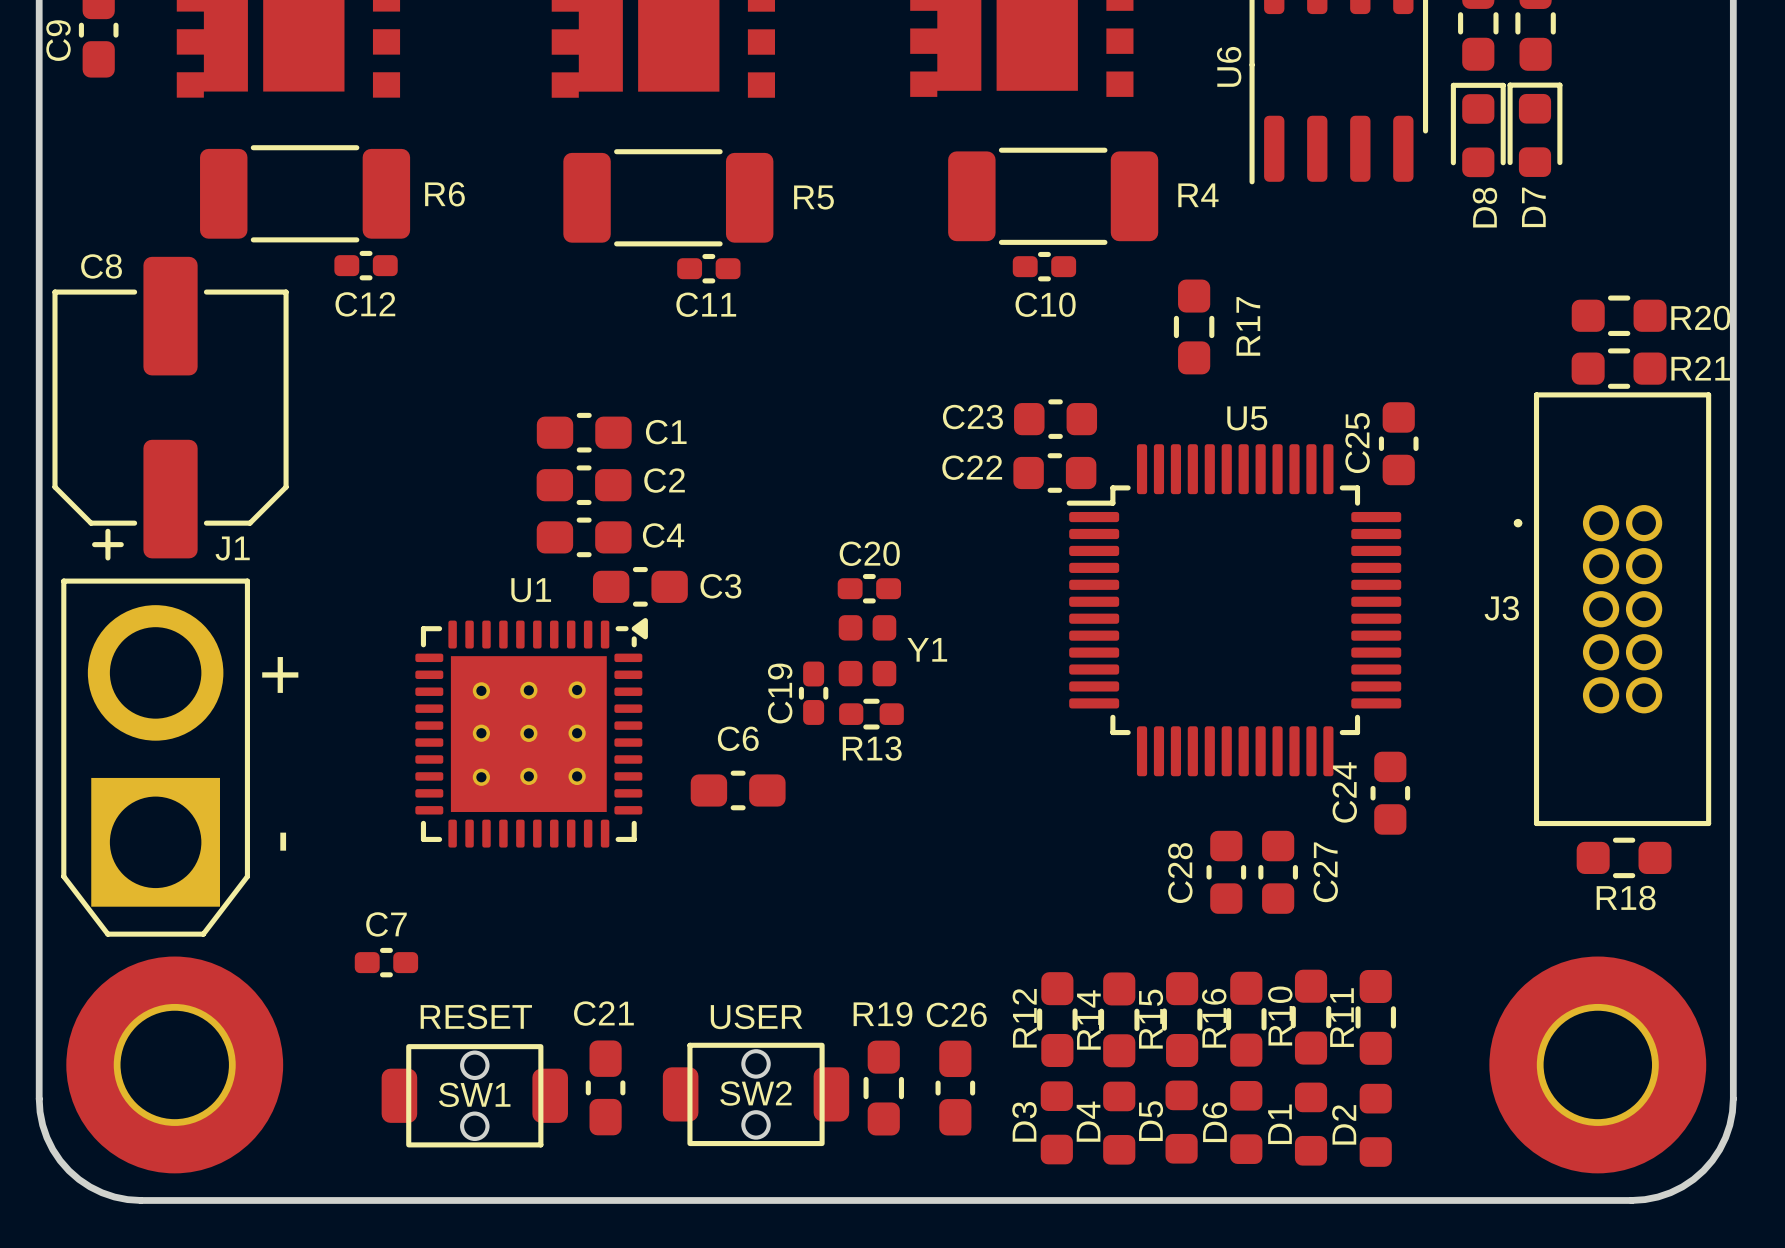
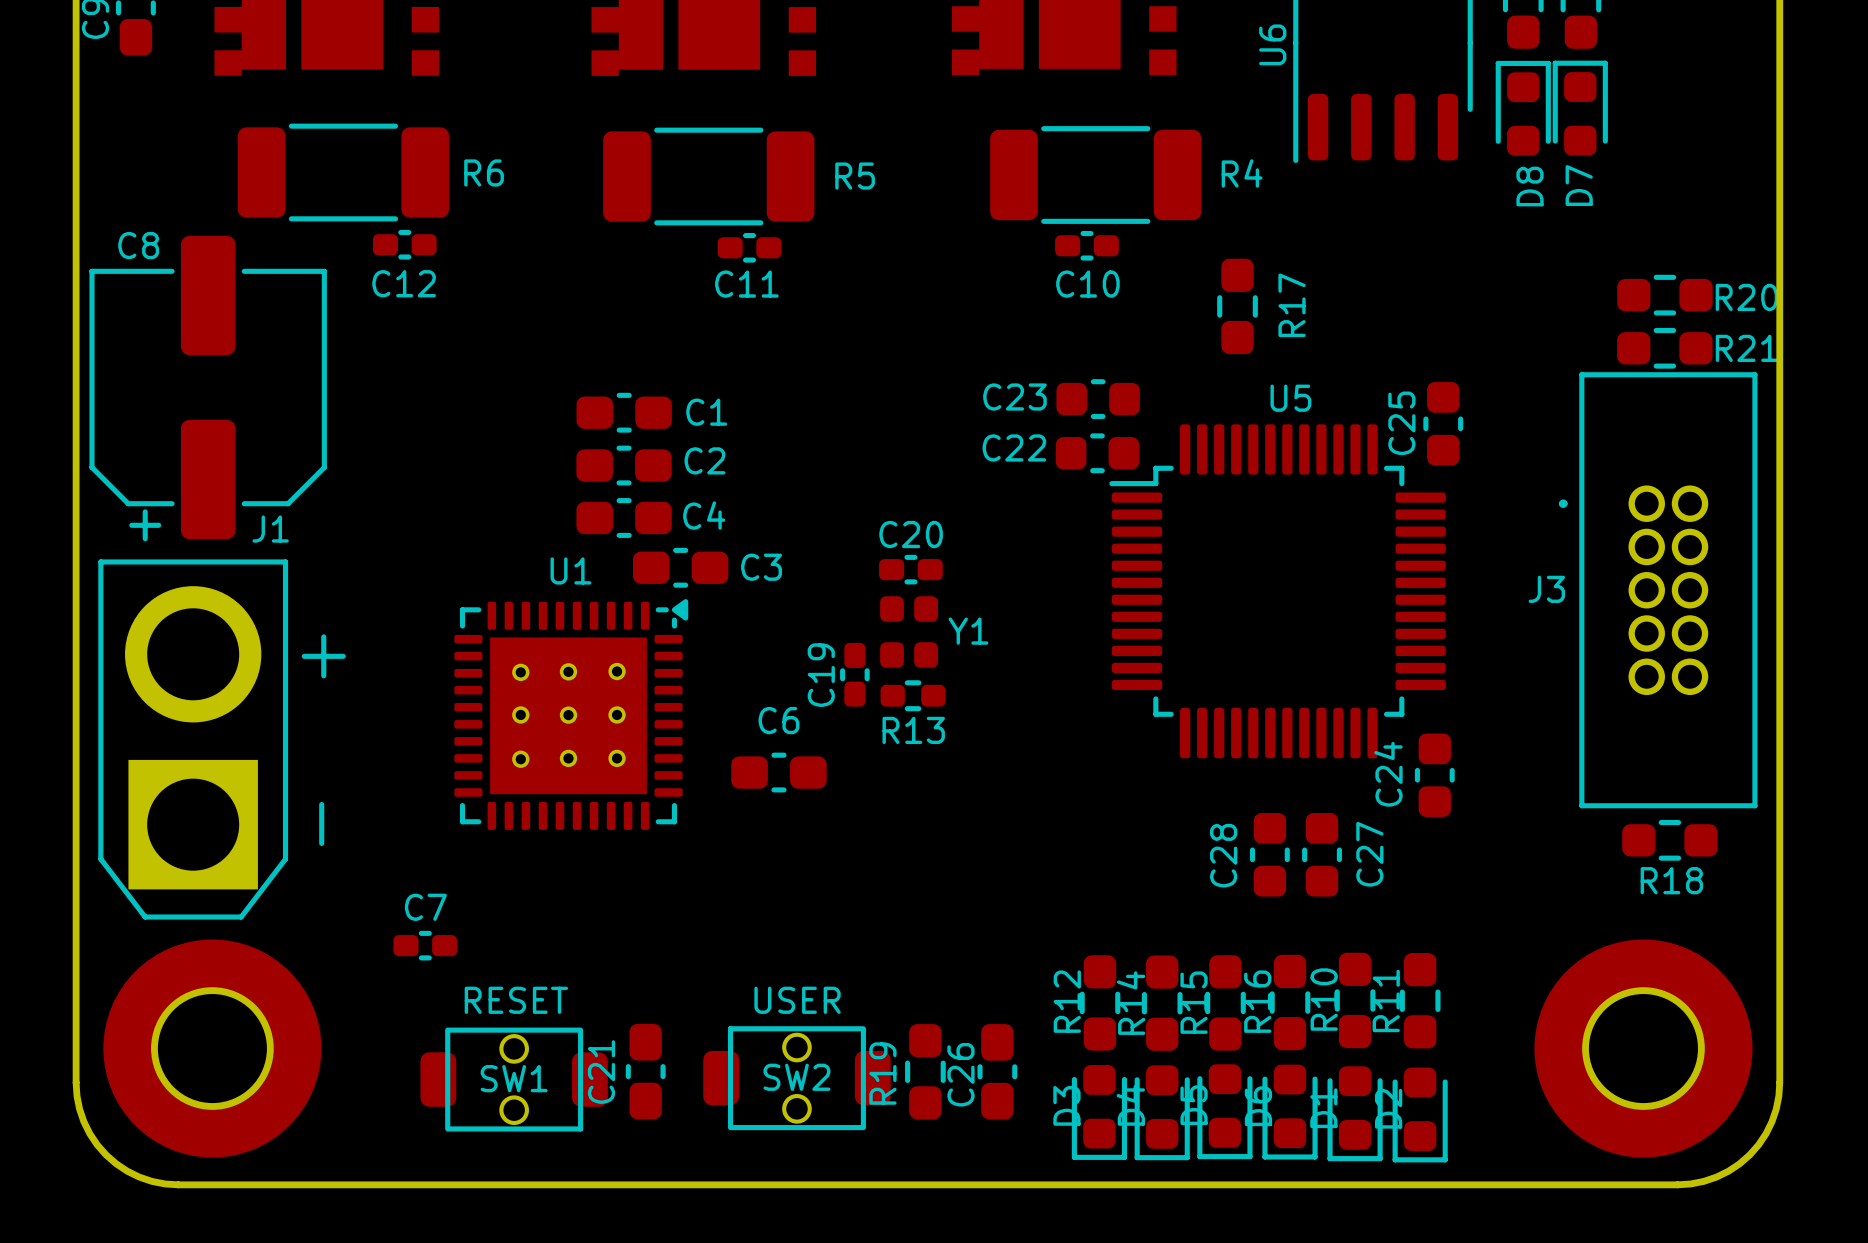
C21 name rotation: 0° (603, 1013) -> 90° counterclockwise (601, 1072)
C21 name position: C21 (603, 1013) -> C21 (601, 1072)
R19 name rotation: 0° (883, 1014) -> 90° counterclockwise (882, 1073)
R19 name position: R19 (883, 1014) -> R19 (882, 1073)
C26 name rotation: 0° (956, 1014) -> 90° counterclockwise (960, 1074)
C26 name position: C26 (956, 1014) -> C26 (960, 1074)
D5 footprint: [1165, 1080, 1198, 1164] -> [1197, 1064, 1253, 1160]
D6 footprint: [1230, 1080, 1263, 1164] -> [1262, 1064, 1318, 1160]
D3 footprint: [1040, 1081, 1073, 1165] -> [1071, 1065, 1128, 1160]
D4 footprint: [1103, 1081, 1136, 1165] -> [1134, 1065, 1190, 1161]
D1 footprint: [1294, 1082, 1328, 1166] -> [1327, 1066, 1383, 1162]
D2 footprint: [1359, 1083, 1392, 1167] -> [1392, 1067, 1448, 1163]

